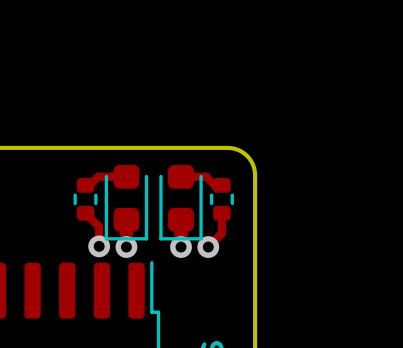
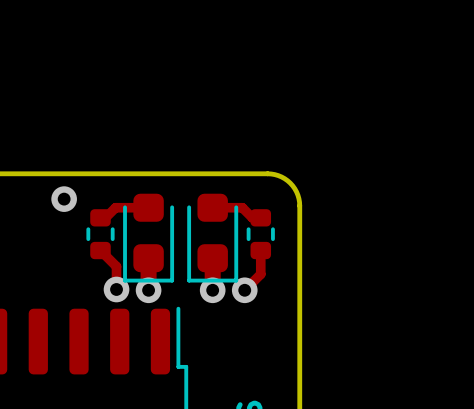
via: none -> (64, 199)

